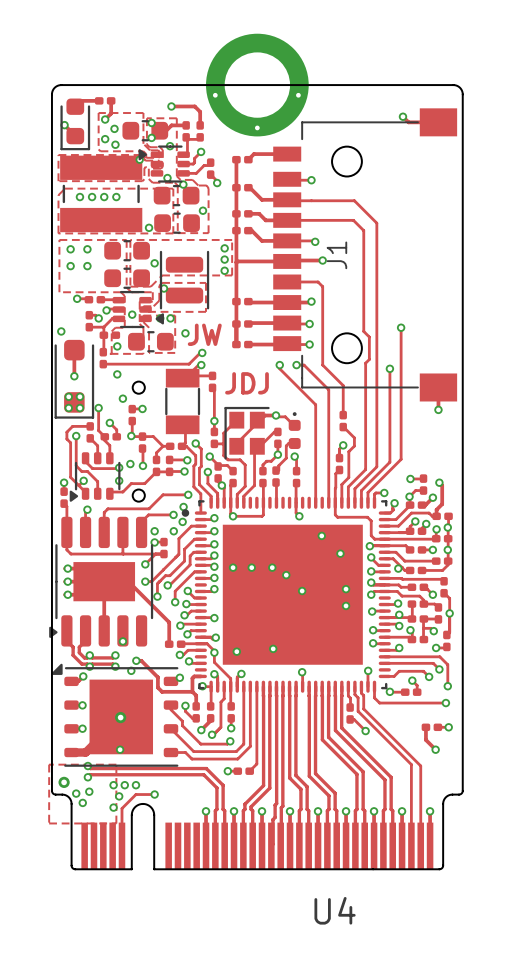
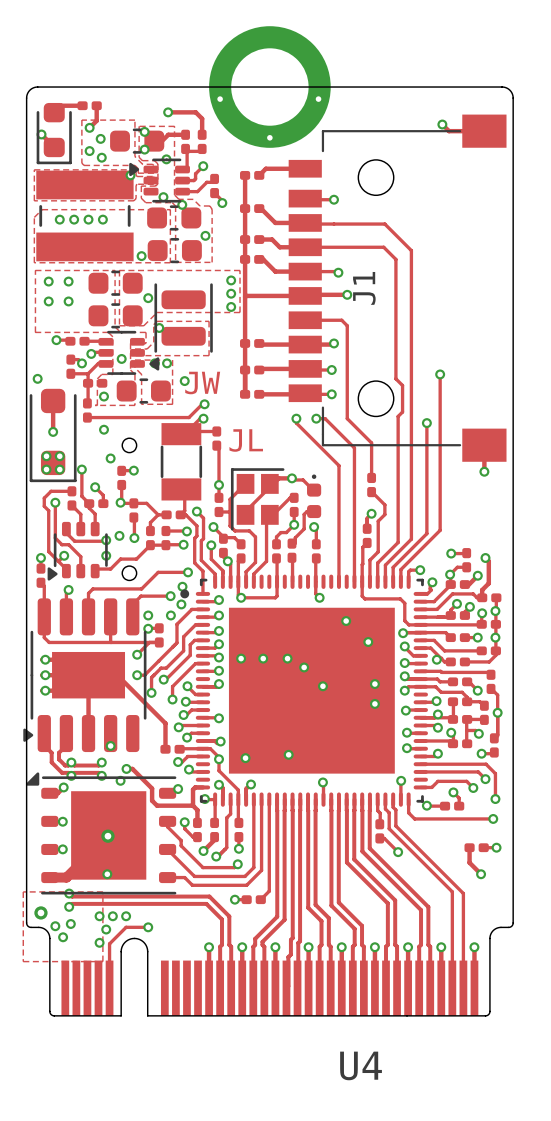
text: JDJ (246, 383) -> JL (246, 440)

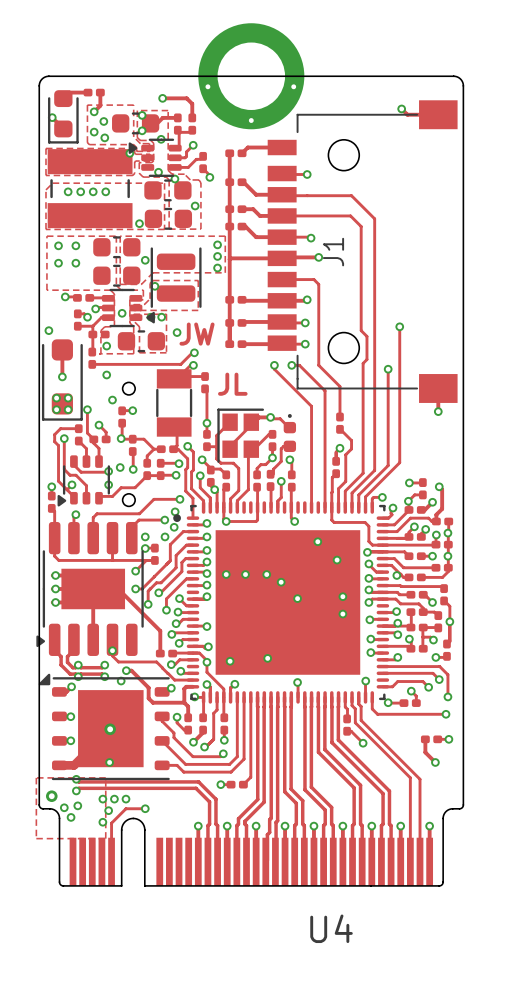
track: none -> (281, 481) (281, 497) (277, 501) (277, 507)
via: none -> (281, 481)
track: none -> (112, 639) (112, 655) (118, 661) (156, 661) (162, 668)
track: none -> (162, 668) (167, 673)
track: none -> (167, 673) (174, 680) (192, 680)

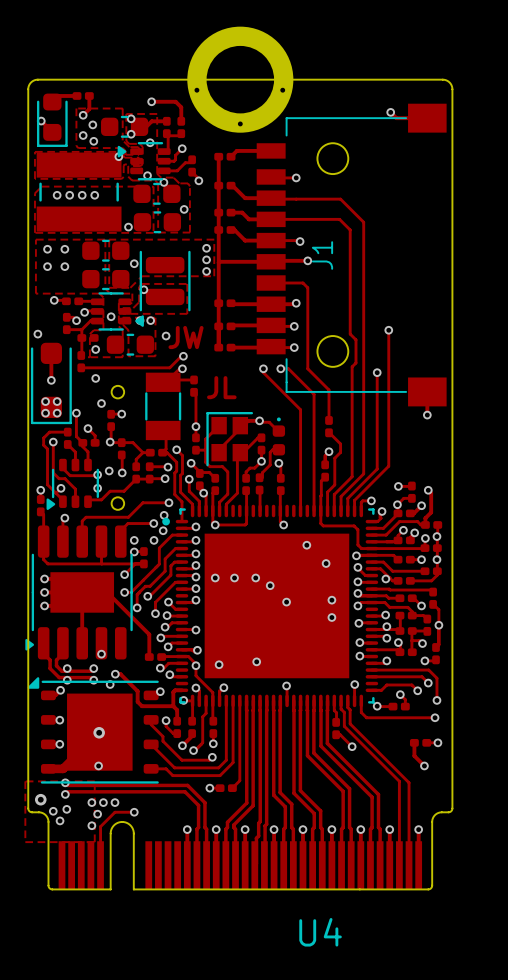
track: (281, 481) (281, 497) (277, 501) (277, 507) -> none
via: (281, 481) -> none
track: (112, 639) (112, 655) (118, 661) (156, 661) (162, 668) -> none
track: (162, 668) (167, 673) -> none
track: (167, 673) (174, 680) (192, 680) -> none

